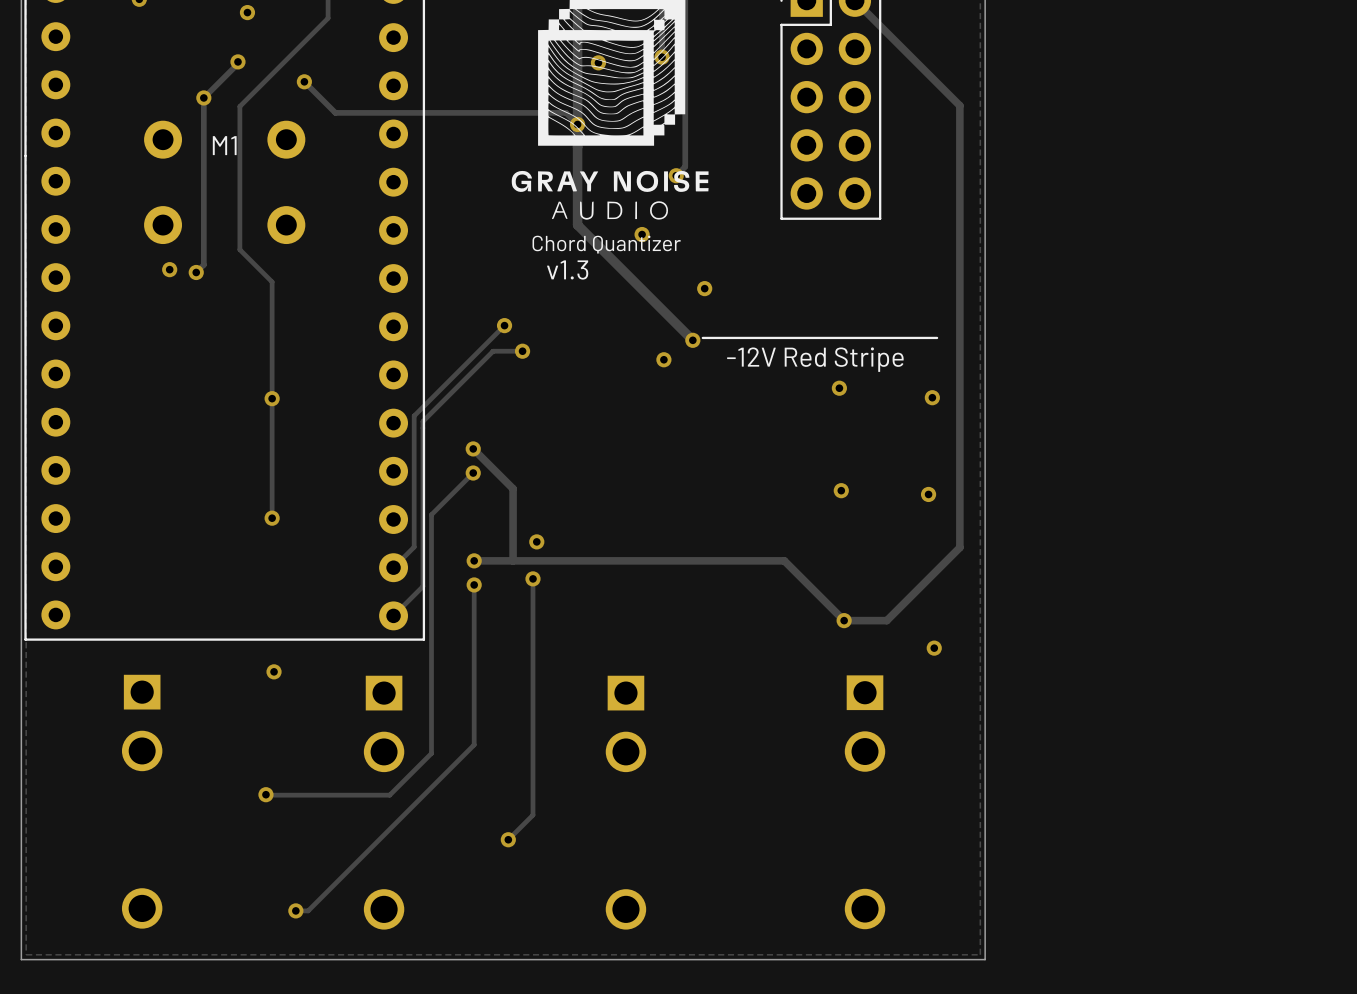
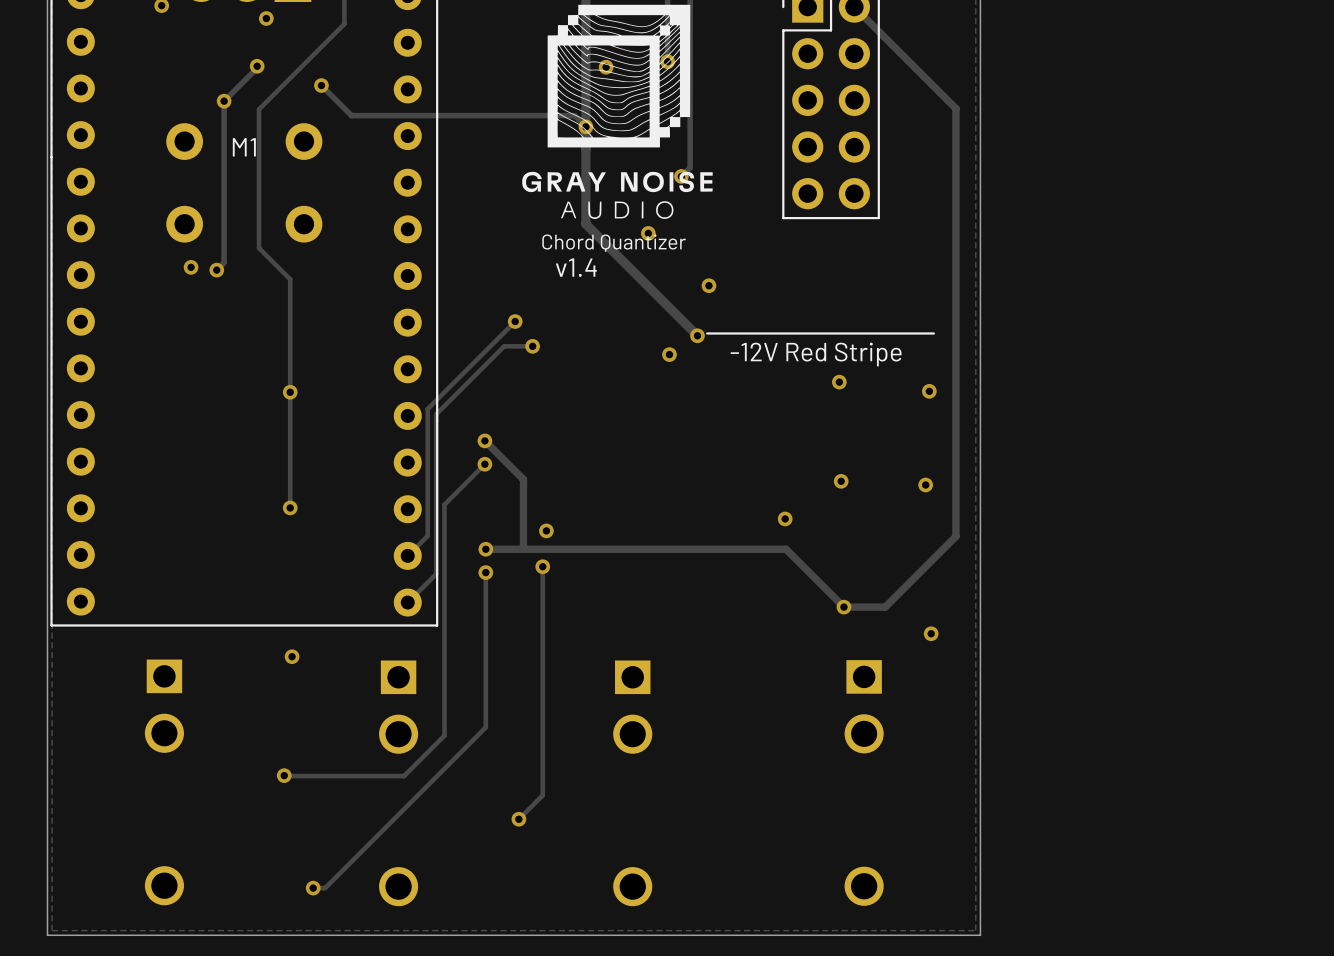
text: v1.3 (567, 269) -> v1.4 (576, 267)
via: none -> (785, 518)

